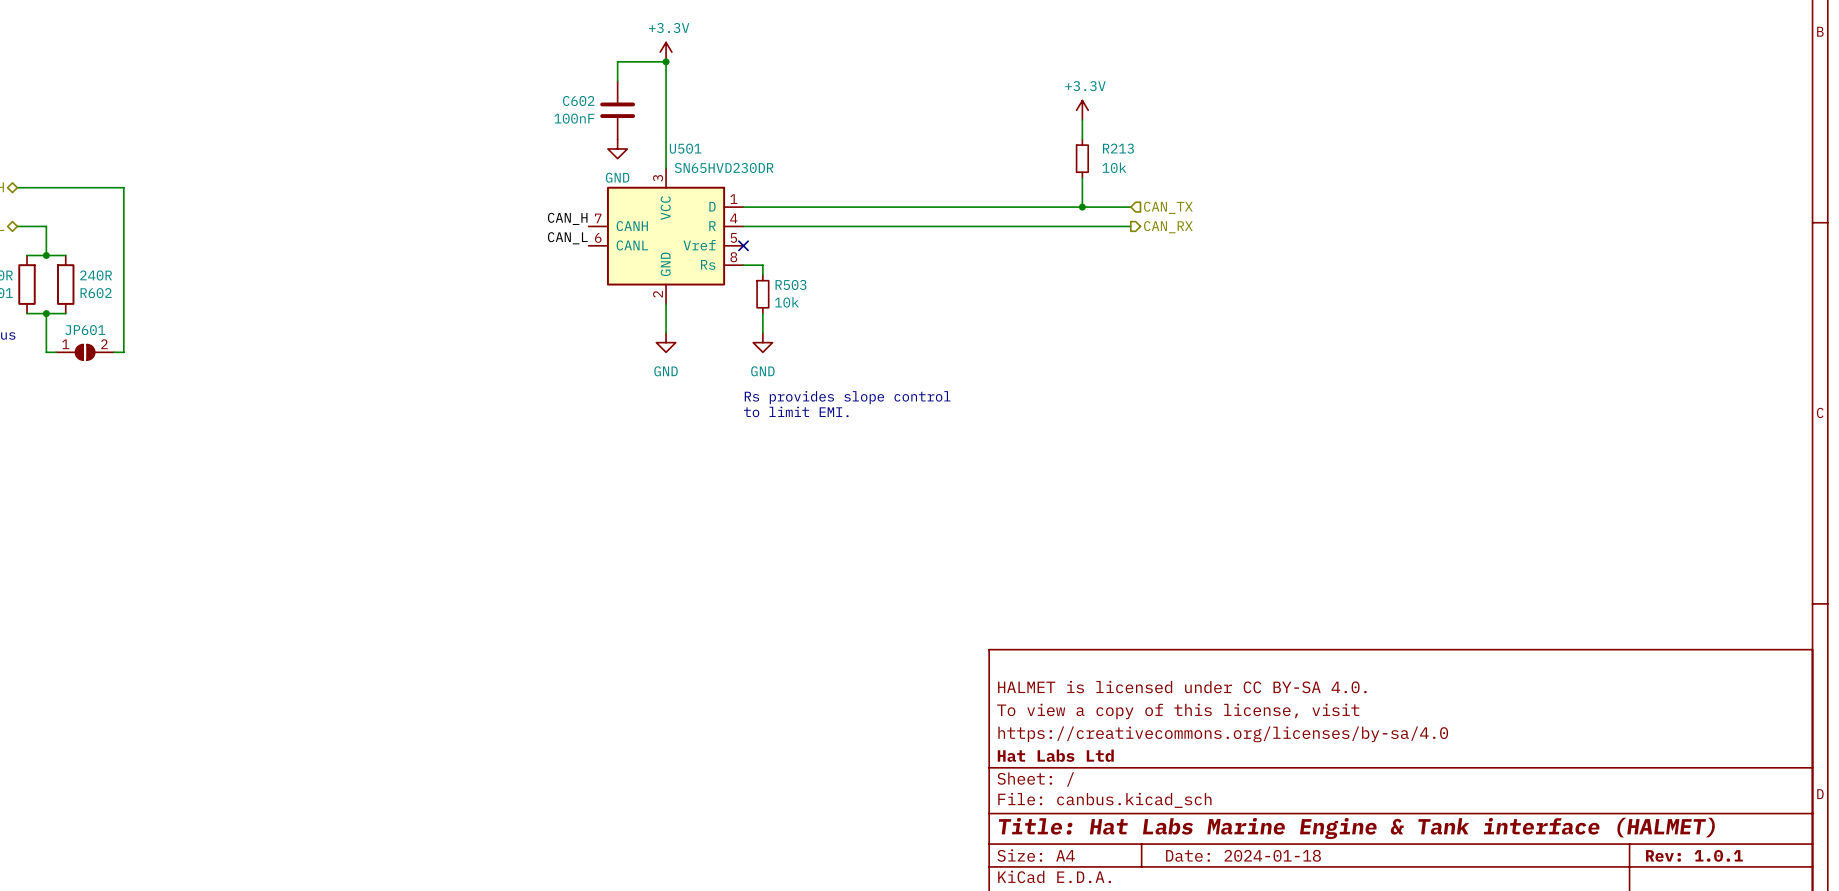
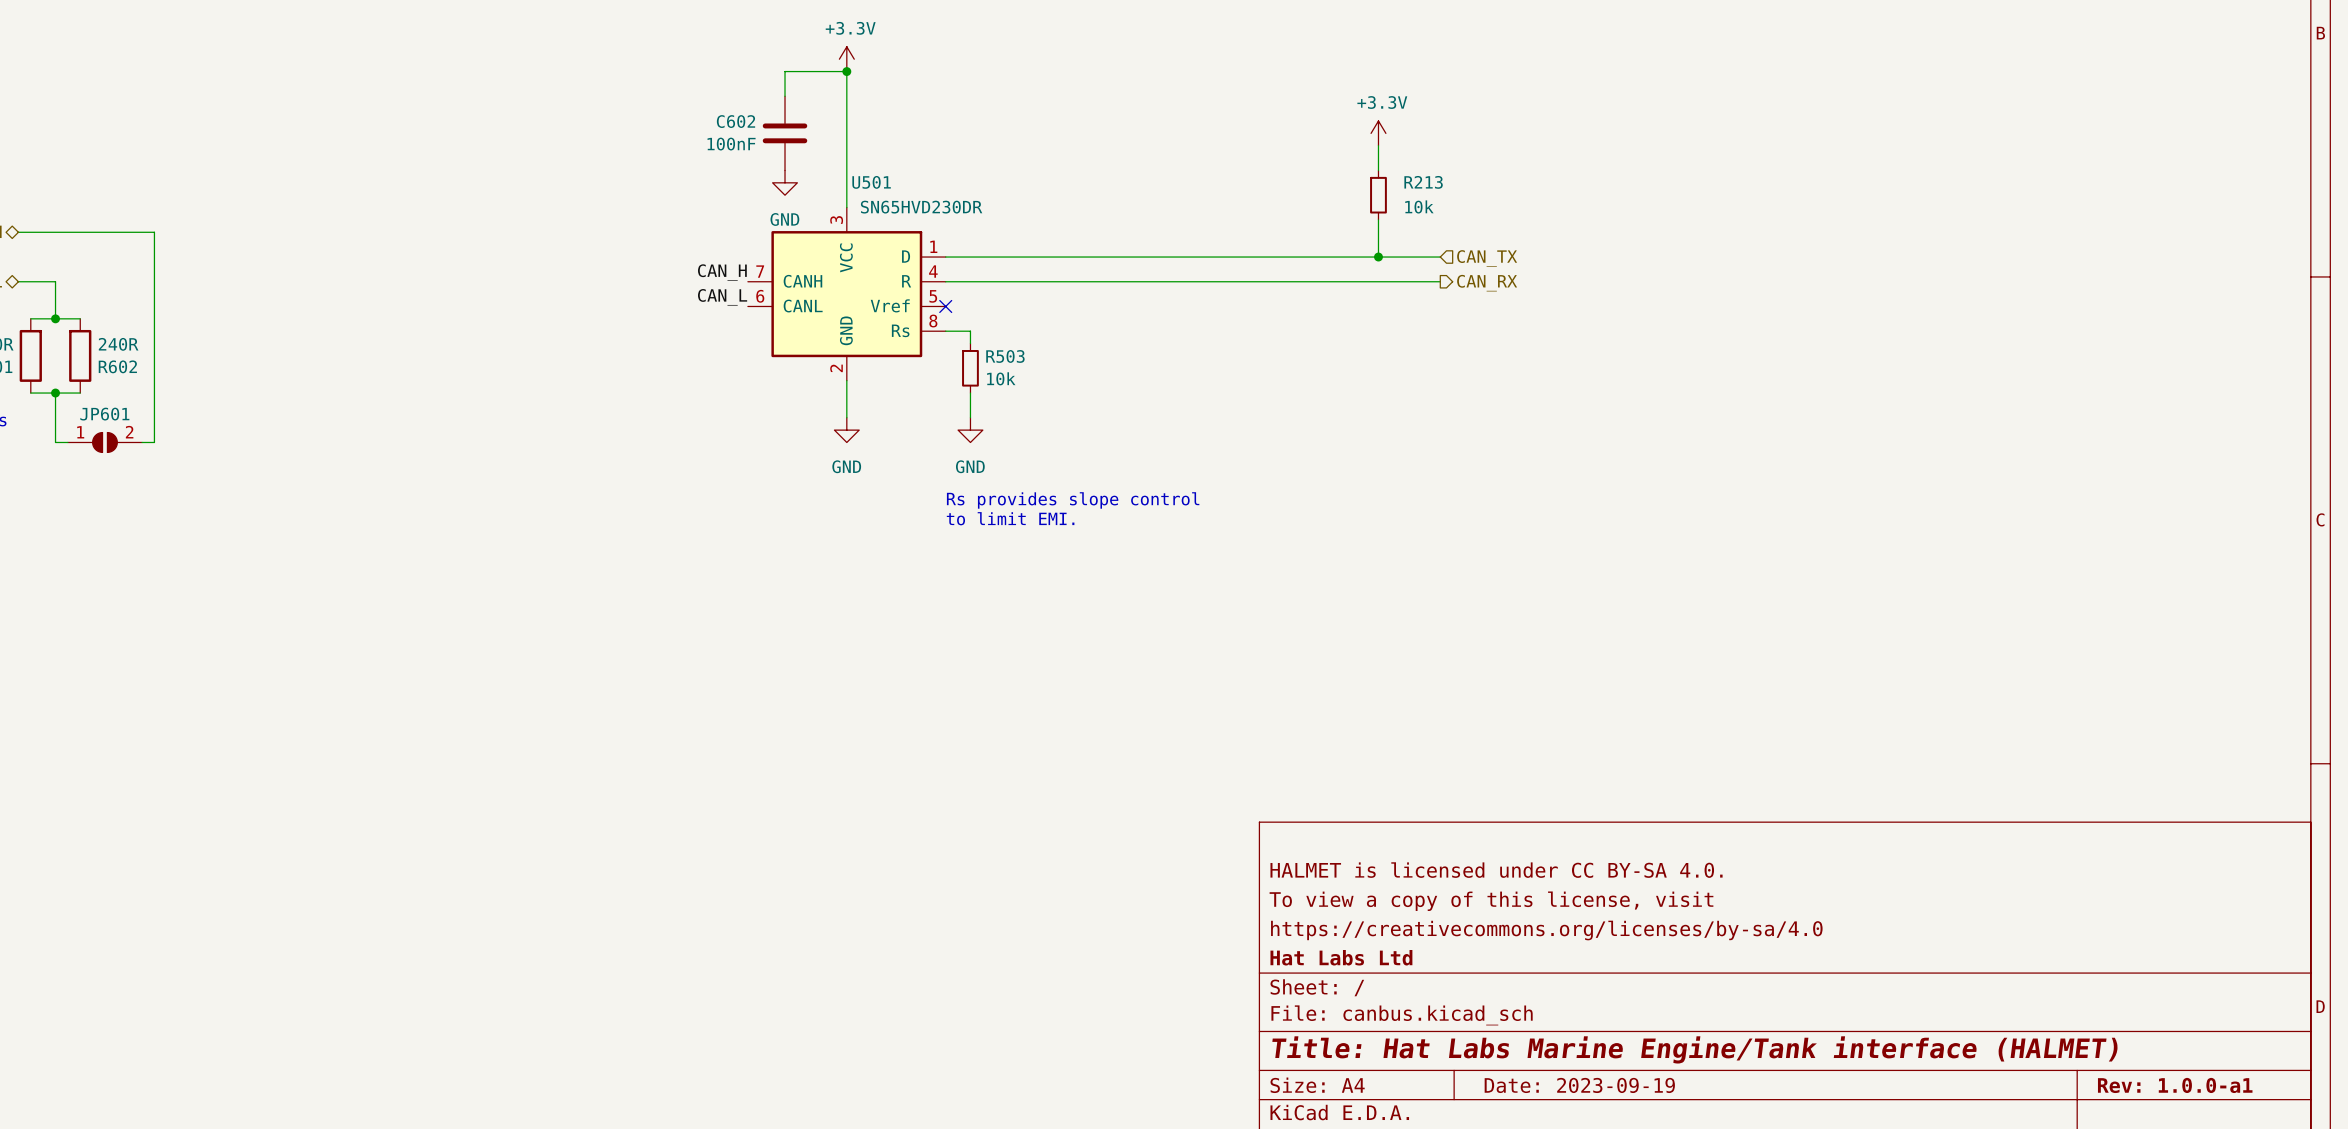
title block: Title: Hat Labs Marine Engine & Tank interface (HALMET) (1356, 828) -> Title: Hat Labs Marine Engine/Tank interface (HALMET) (1695, 1049)
title block: Date: 2024-01-18 (1243, 855) -> Date: 2023-09-19 (1579, 1085)
title block: Rev: 1.0.1 (1694, 855) -> Rev: 1.0.0-a1 (2175, 1085)

